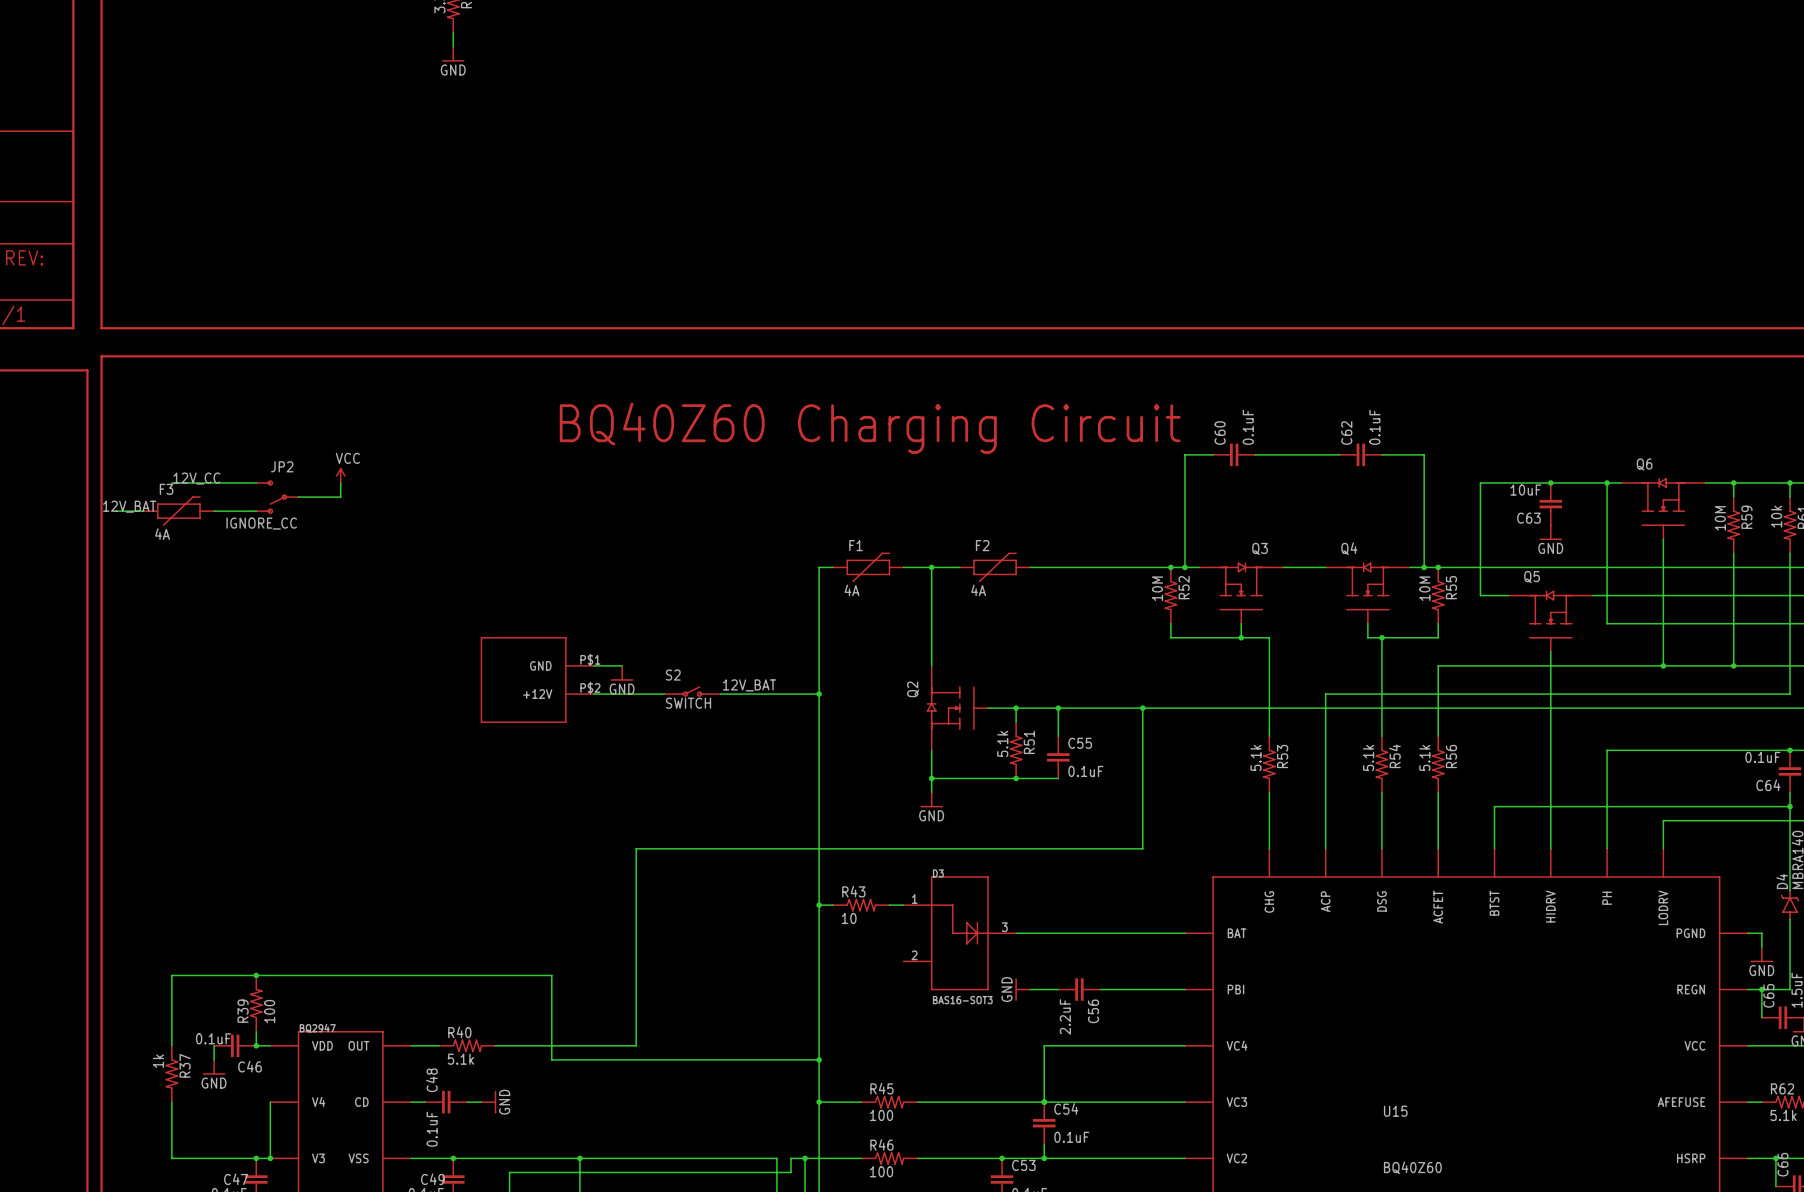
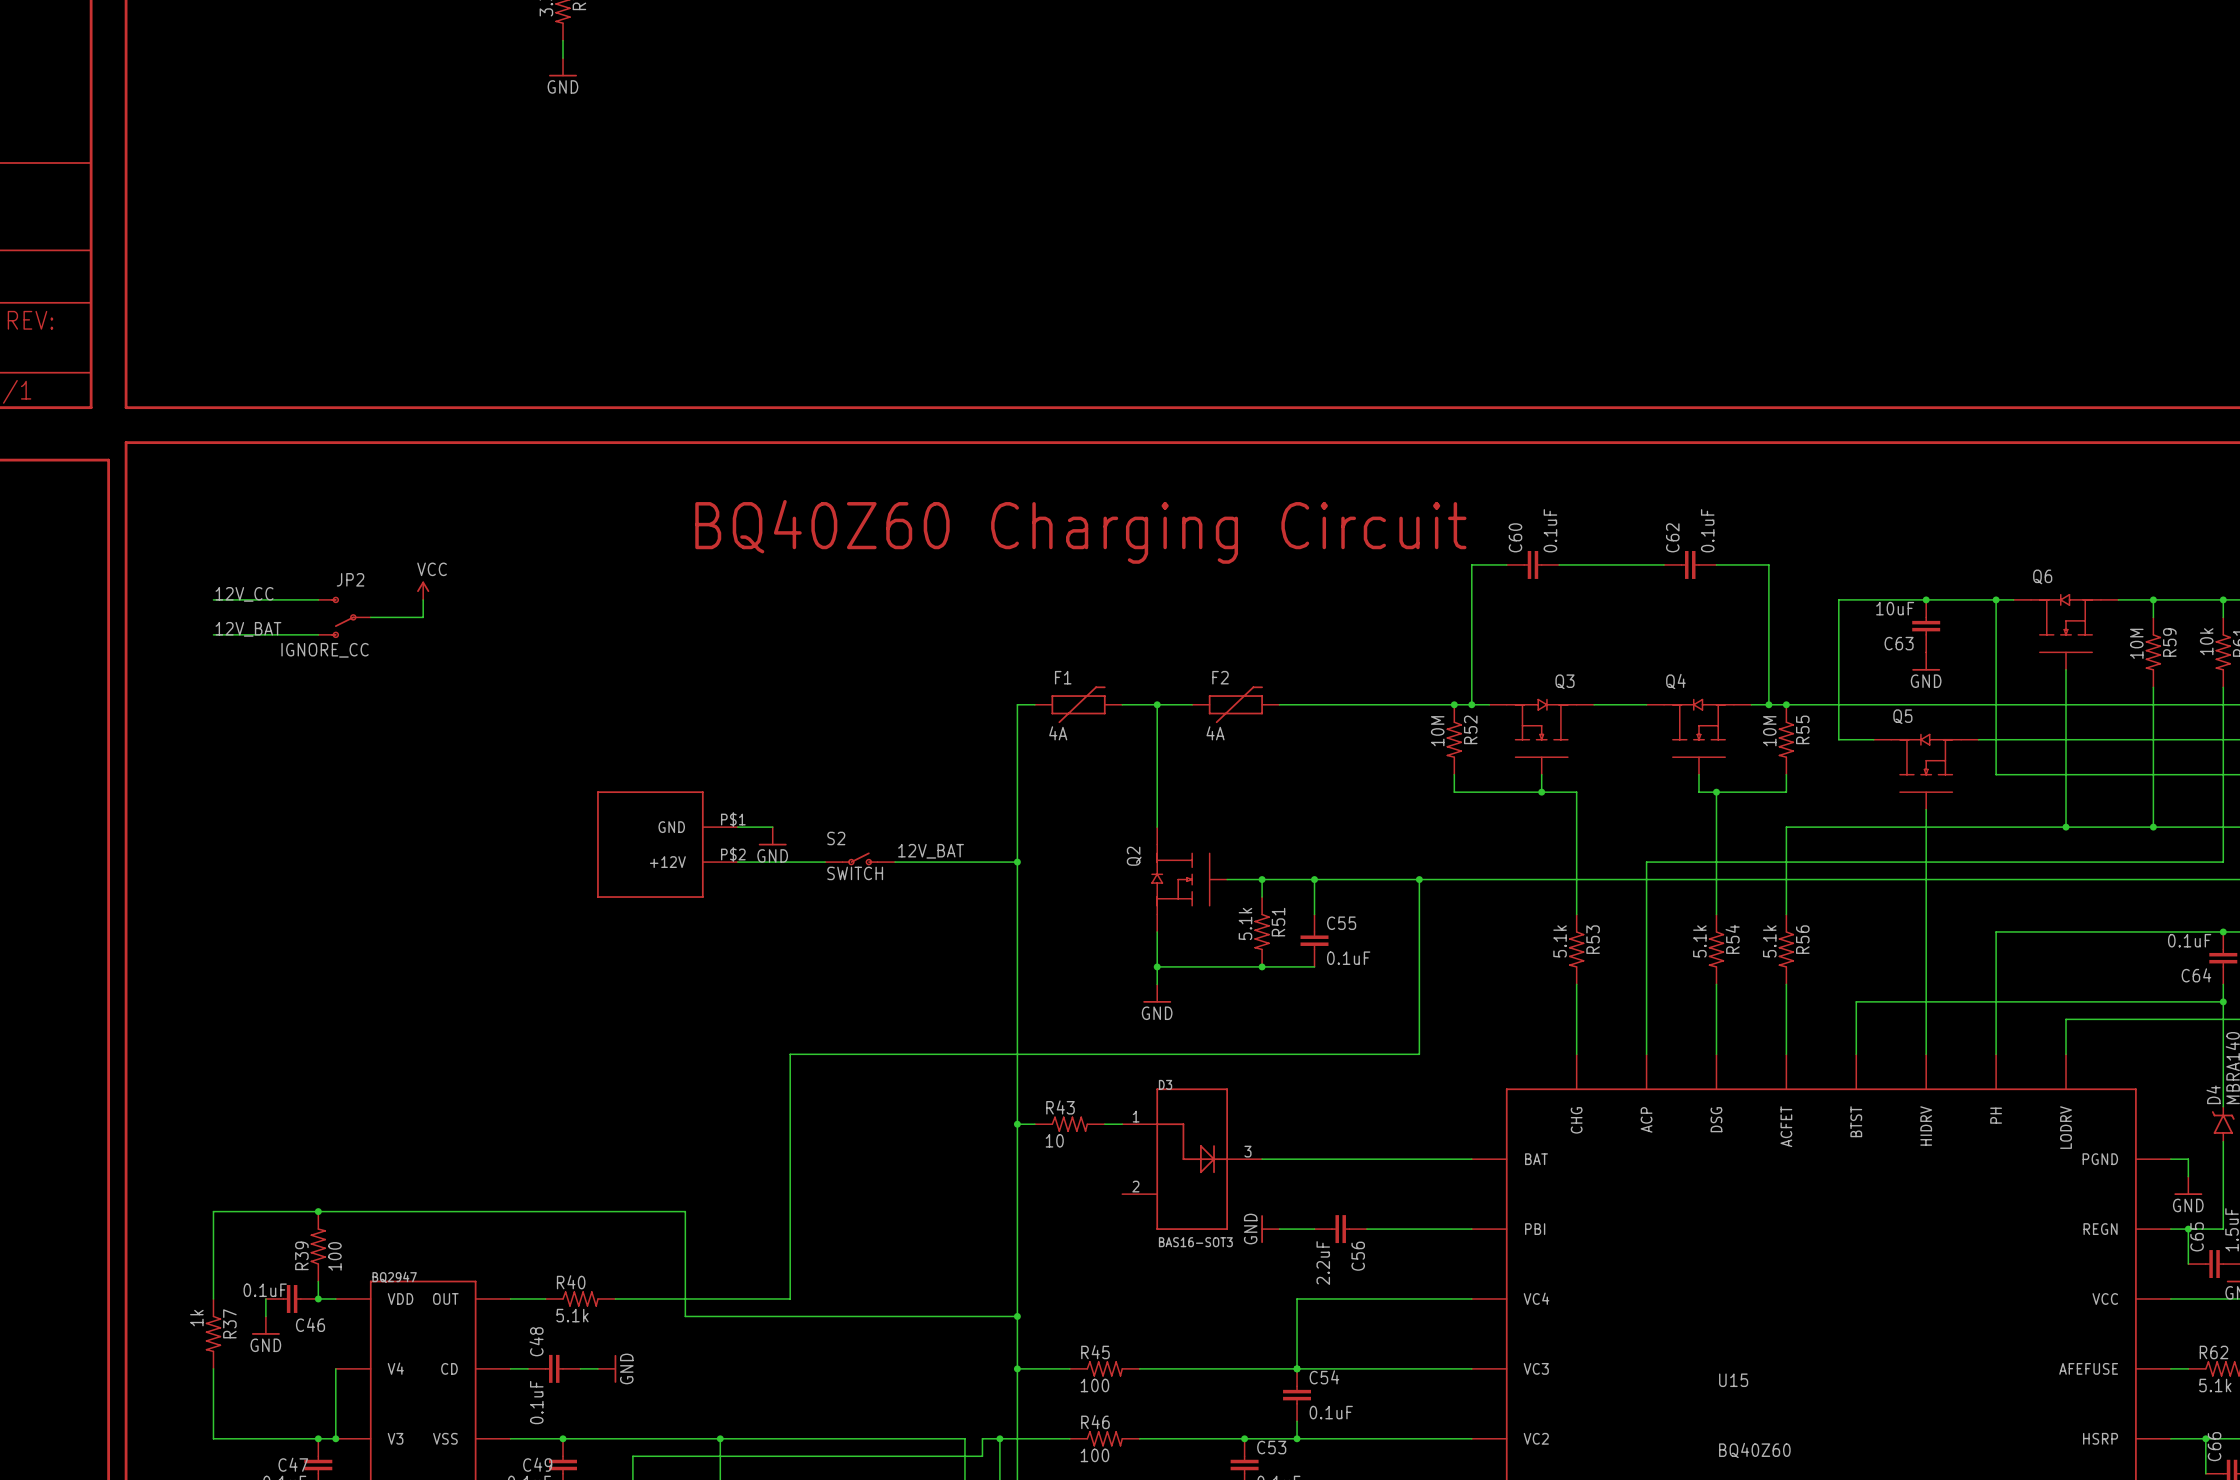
label position: 12V_BAT (129, 506) -> 12V_BAT (248, 629)
wire: (115, 511) (143, 511) -> none
wire: none -> (213, 634) (265, 634)
F3: 4A (178, 511) -> none

